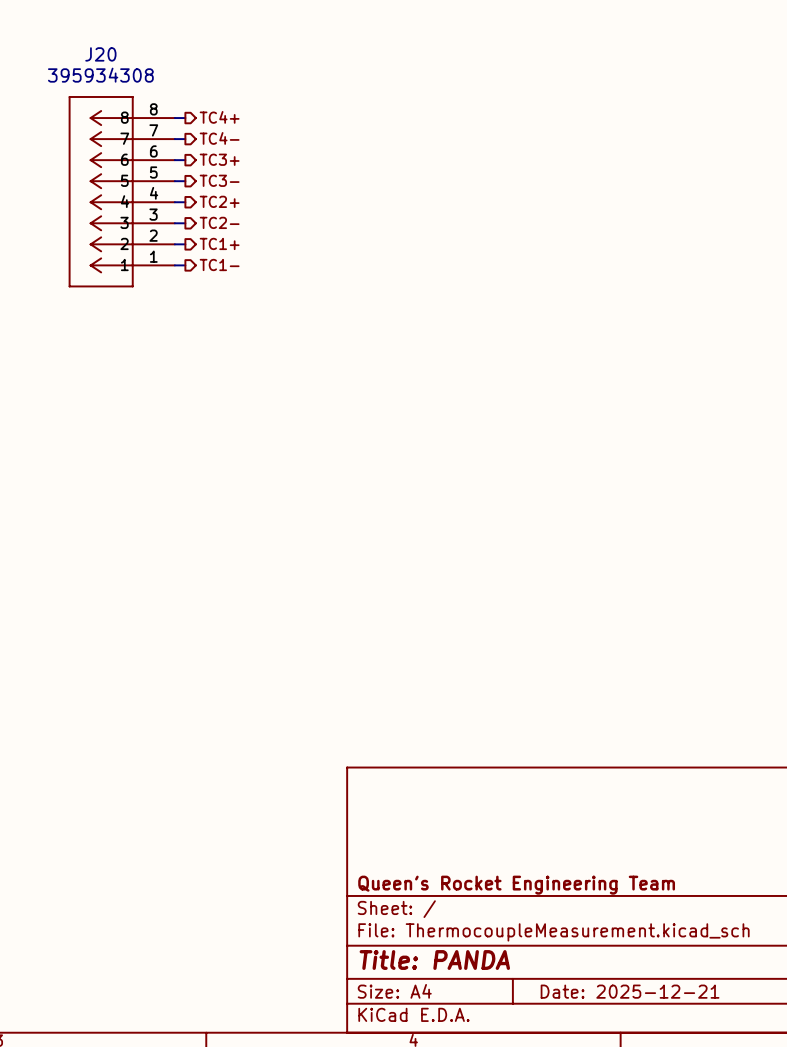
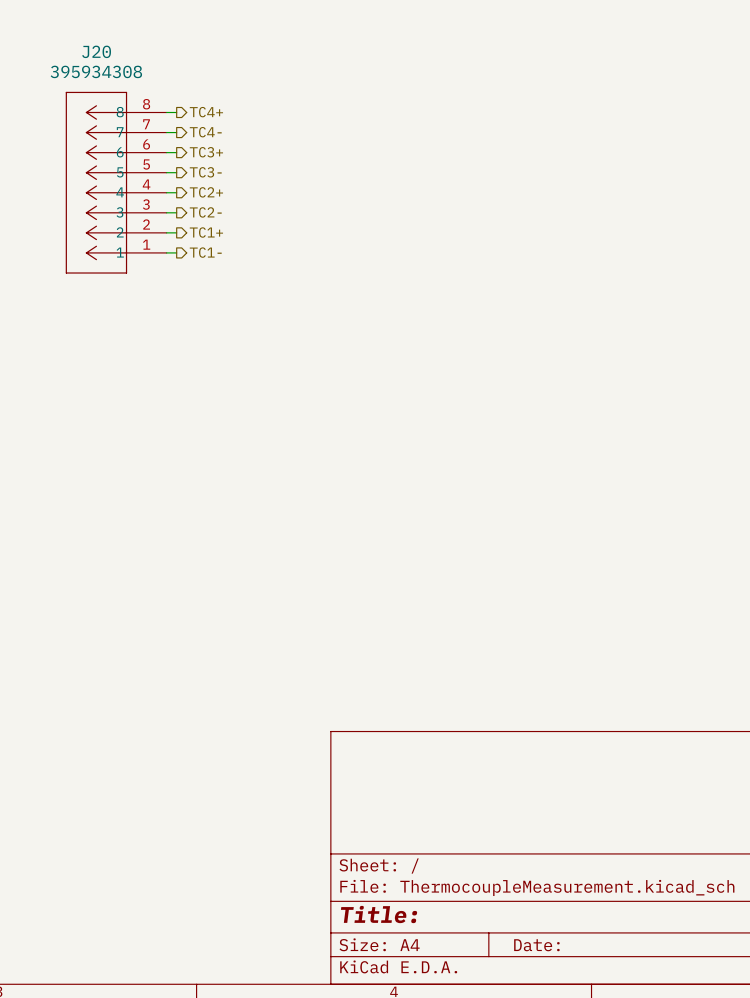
title block: Queen's Rocket Engineering Team (516, 885) -> none
title block: Title: PANDA (434, 960) -> Title: (379, 914)
title block: Date: 2025-12-21 (630, 991) -> Date: (536, 945)

